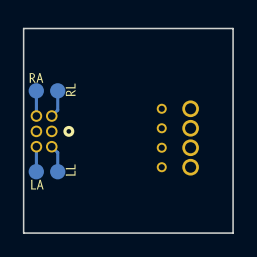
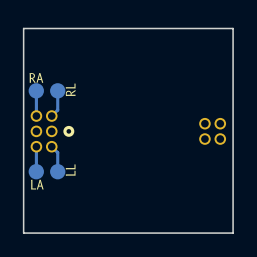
part: (177, 108) -> none
part: (177, 128) -> none
part: none -> (212, 131)
part: (177, 147) -> none
part: (177, 167) -> none

